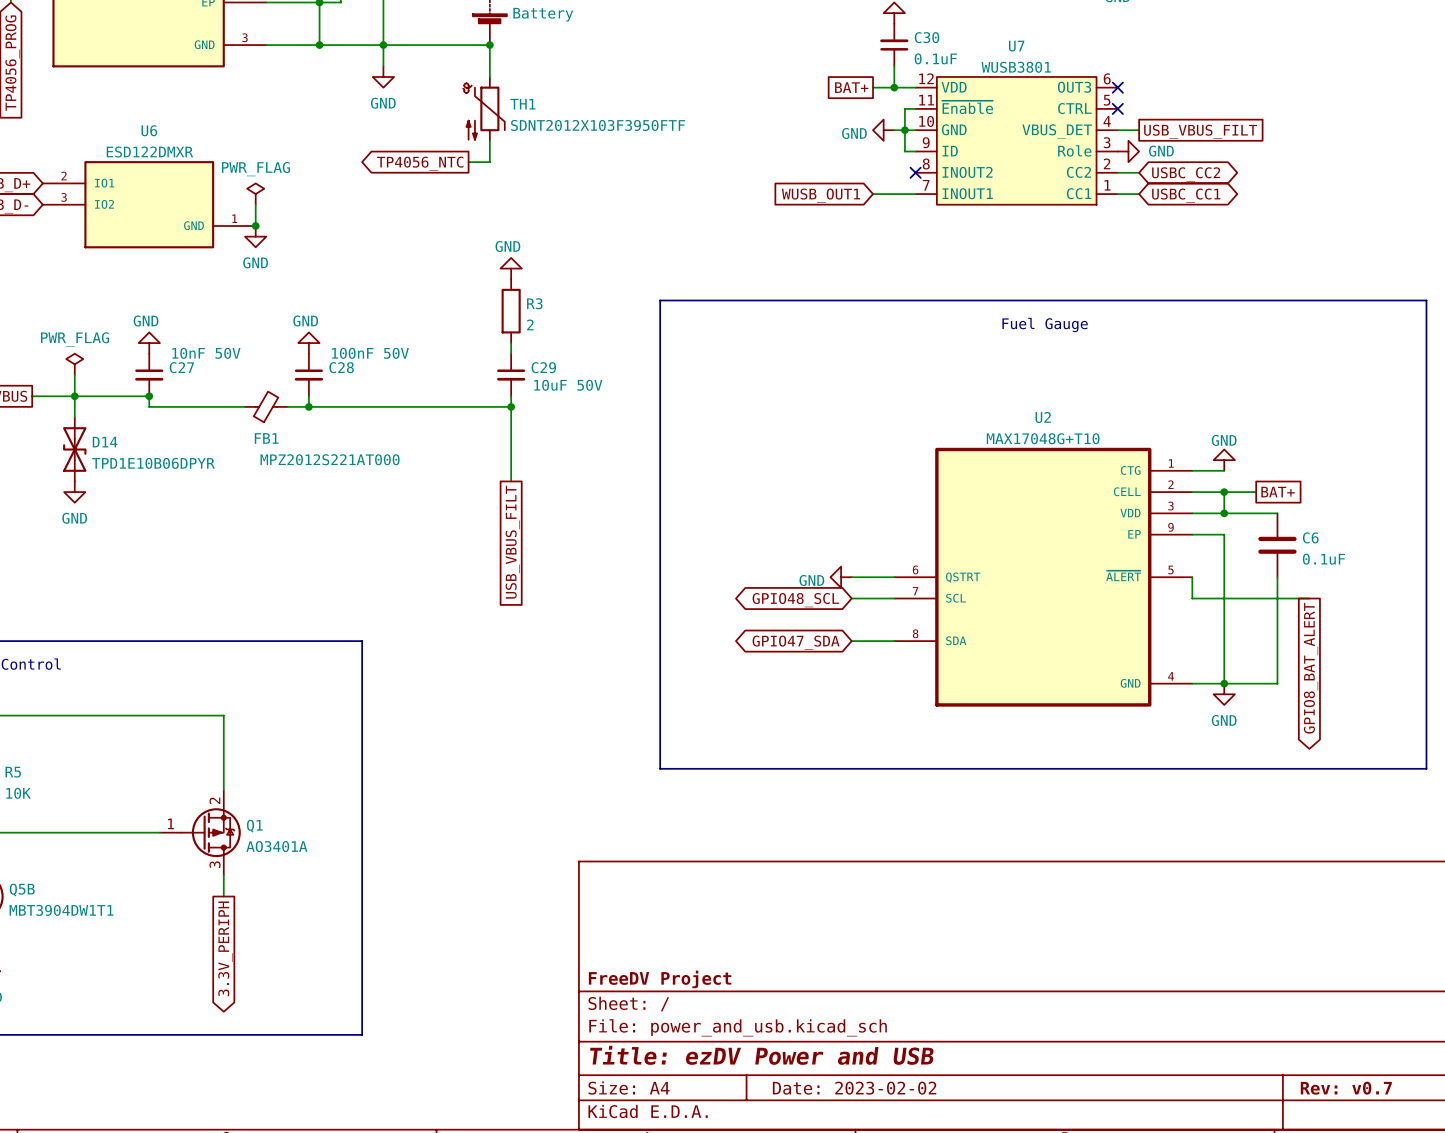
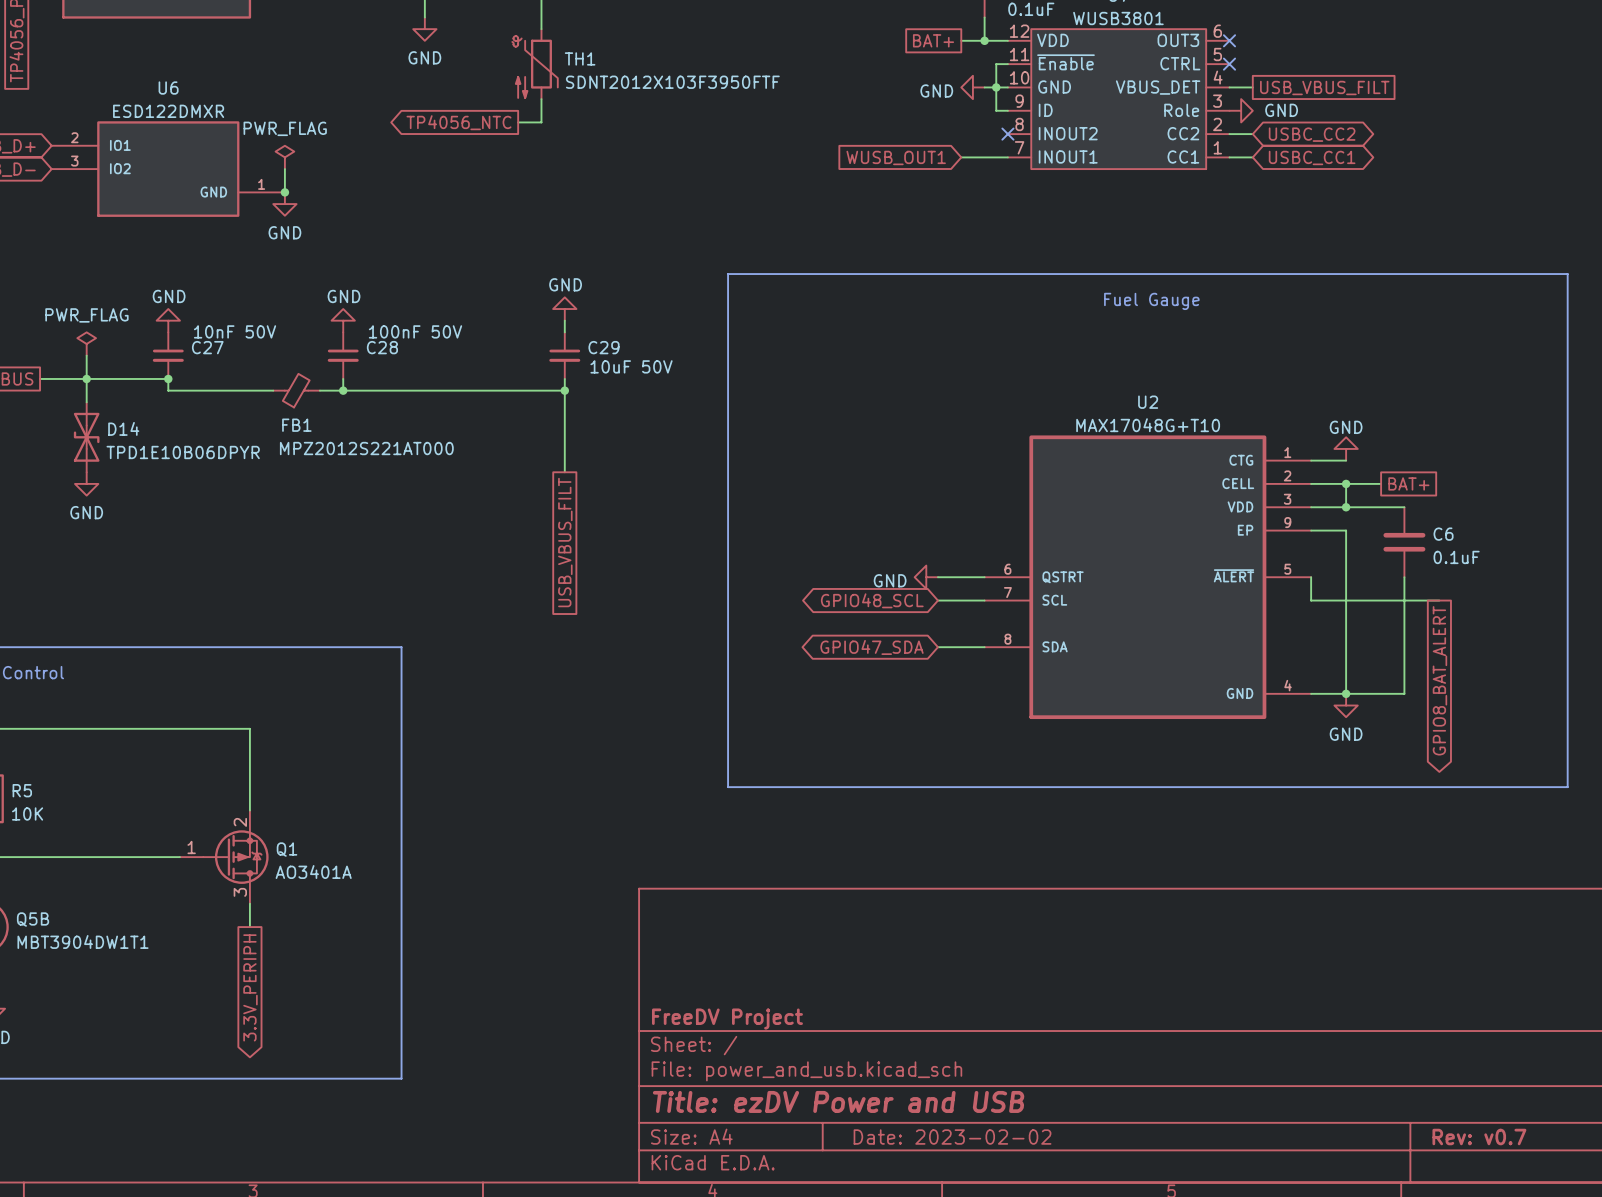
power symbol position: GND (511, 268) -> GND (564, 309)
R3: 2 (511, 311) -> none

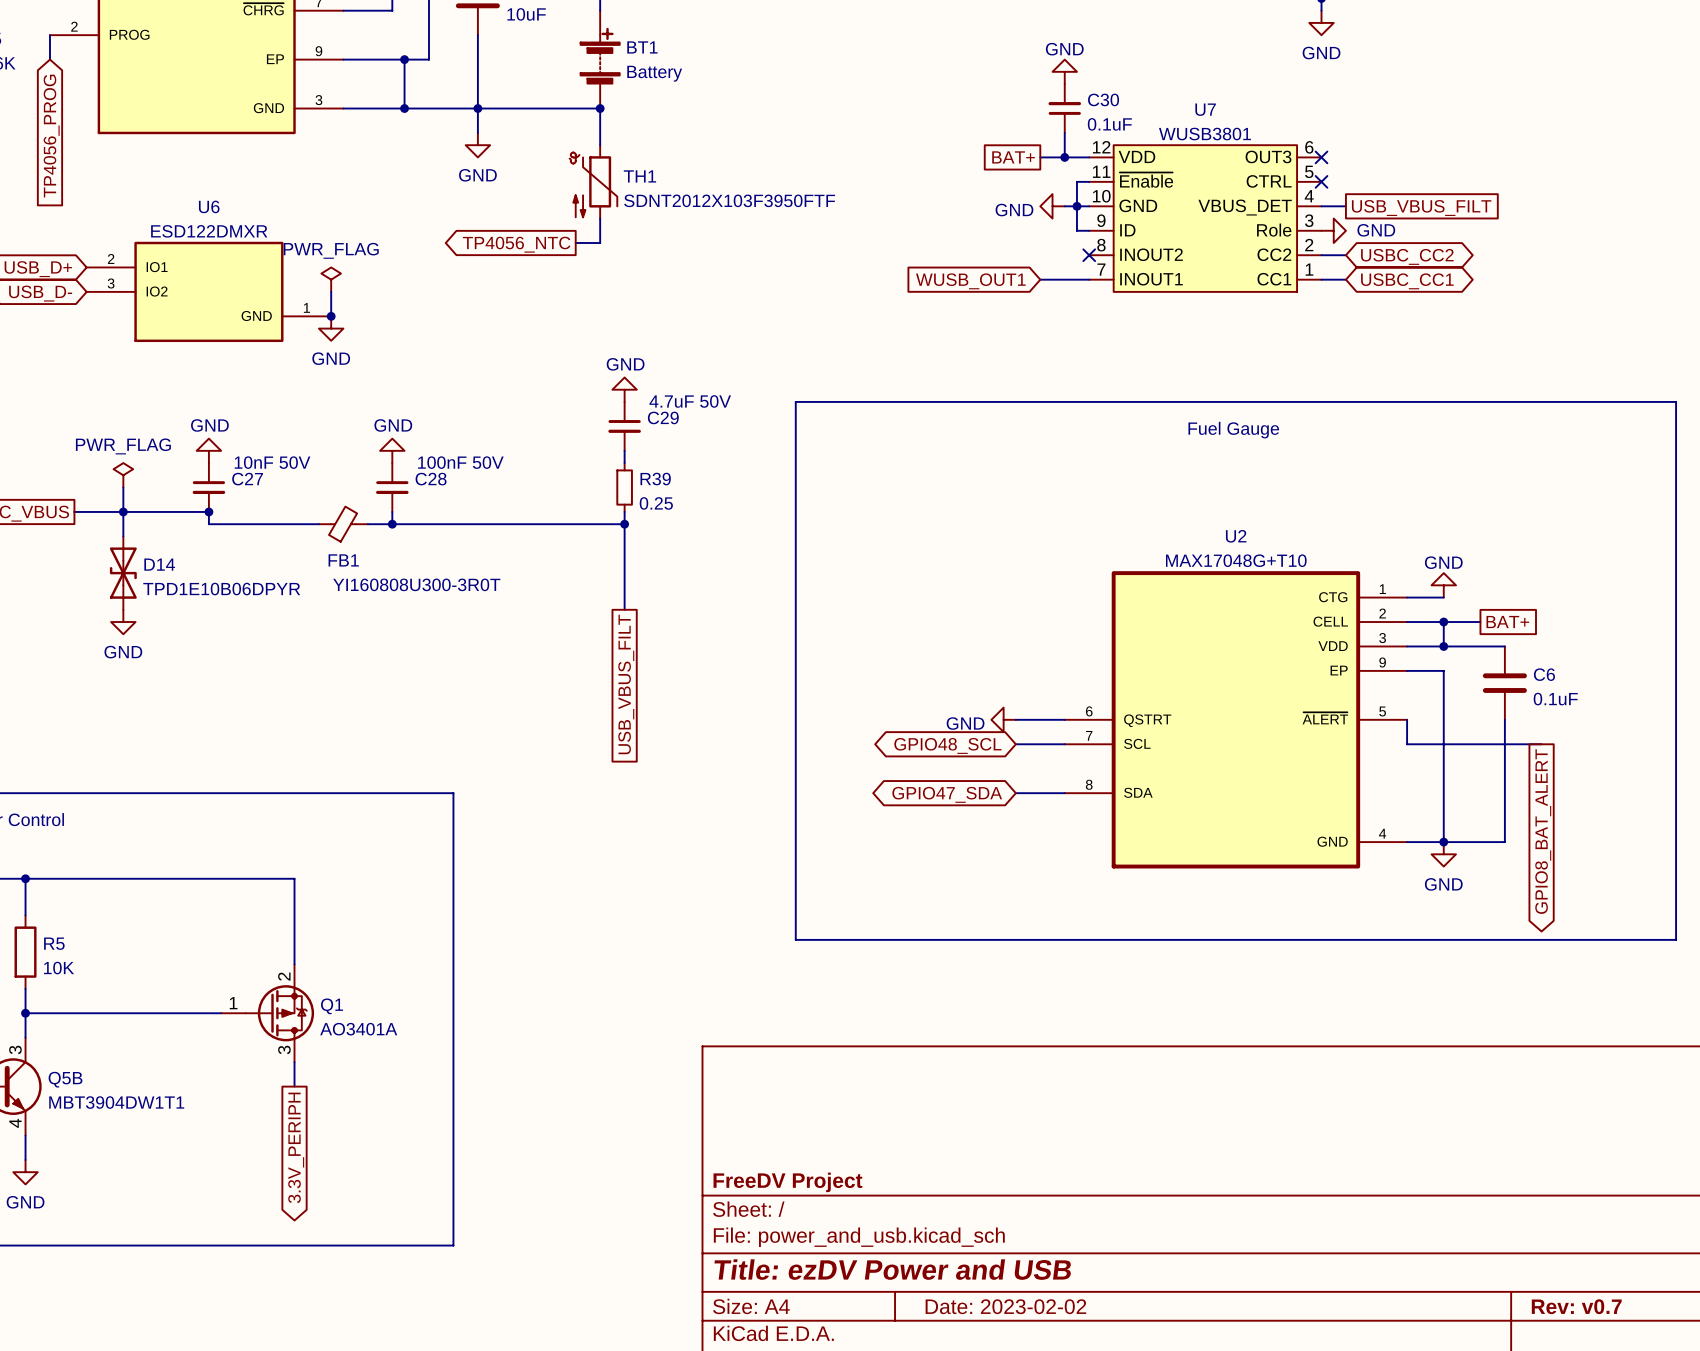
power symbol position: GND (564, 309) -> GND (624, 389)
C29 position: (564, 355) -> (624, 426)
R39: none -> 0.25 (624, 487)
C29 value: 10uF 50V (631, 366) -> 4.7uF 50V (690, 401)
FB1 value: MPZ2012S221AT000 (366, 448) -> YI160808U300-3R0T (416, 584)

